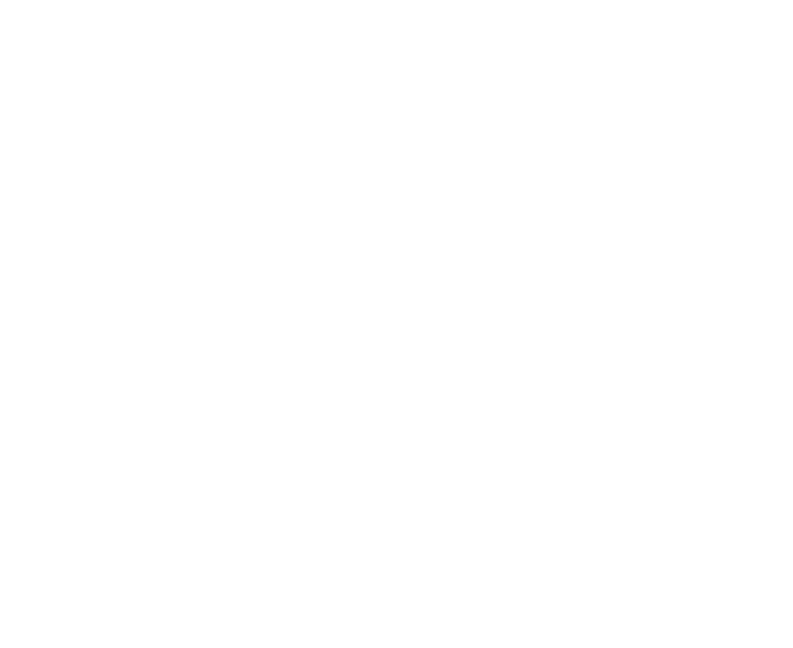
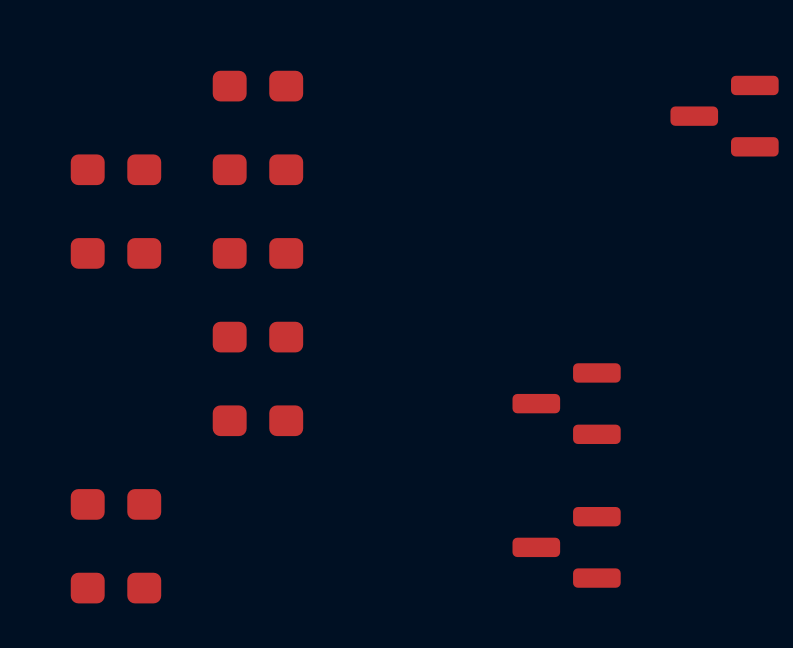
part: none -> (257, 86)
part: none -> (724, 116)
part: none -> (115, 169)
part: none -> (257, 169)
part: none -> (115, 253)
part: none -> (257, 253)
part: none -> (257, 337)
part: none -> (566, 403)
part: none -> (257, 420)
part: none -> (115, 504)
part: none -> (566, 547)
part: none -> (115, 588)

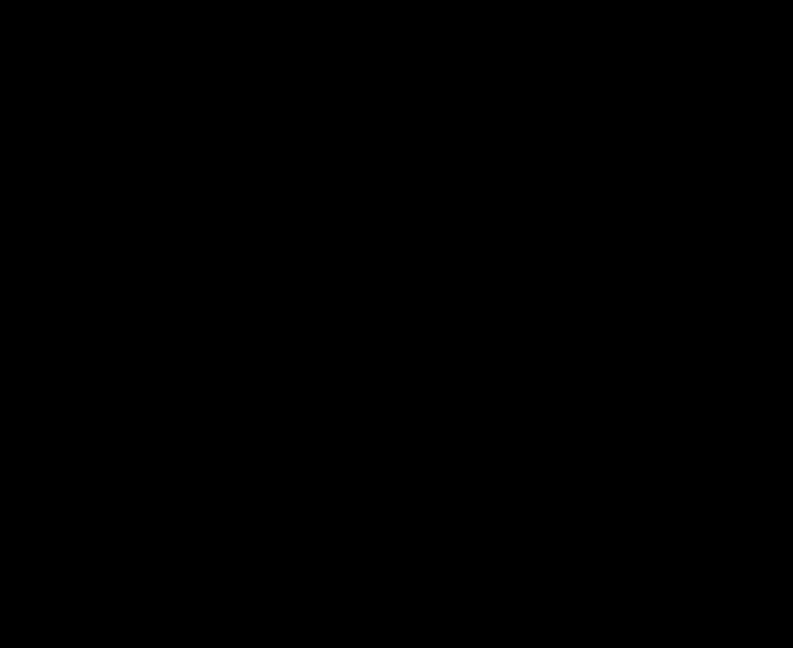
part: (257, 86) -> none
part: (724, 116) -> none
part: (115, 169) -> none
part: (257, 169) -> none
part: (115, 253) -> none
part: (257, 253) -> none
part: (257, 337) -> none
part: (566, 403) -> none
part: (257, 420) -> none
part: (115, 504) -> none
part: (566, 547) -> none
part: (115, 588) -> none

